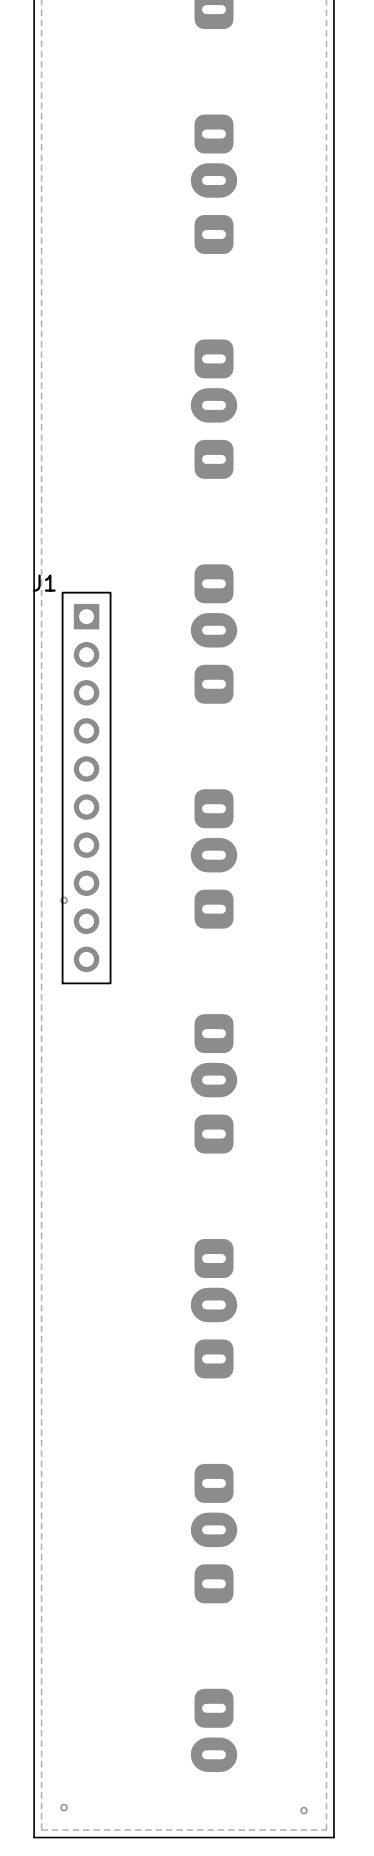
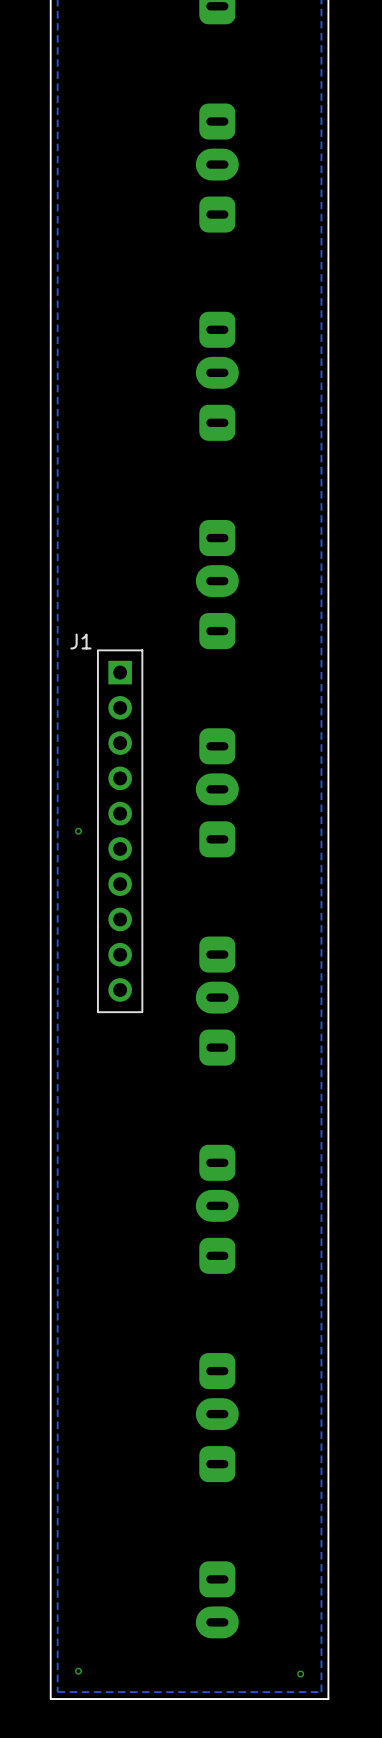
J1 position: (86, 788) -> (120, 831)

